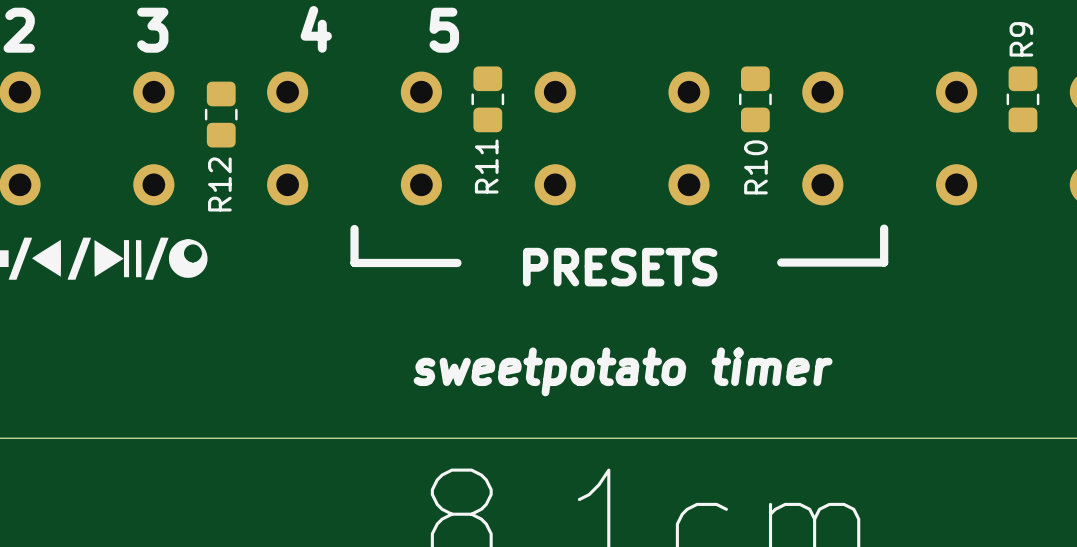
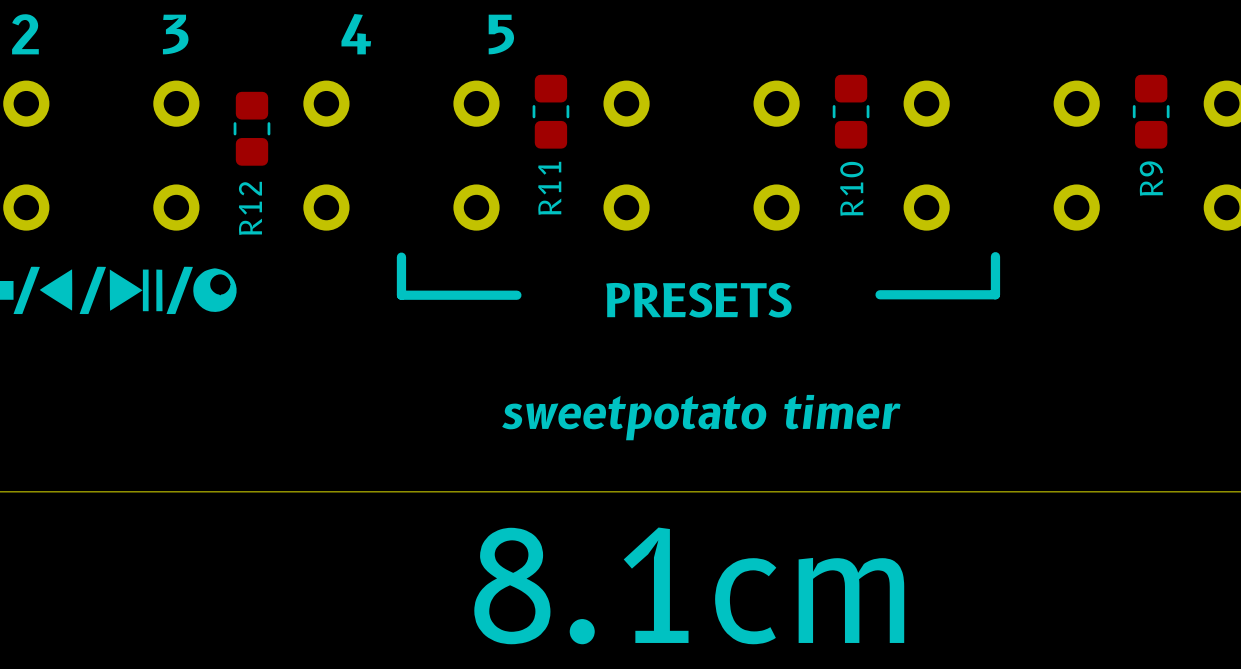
R9 name position: R9 (1021, 39) -> R9 (1151, 178)

